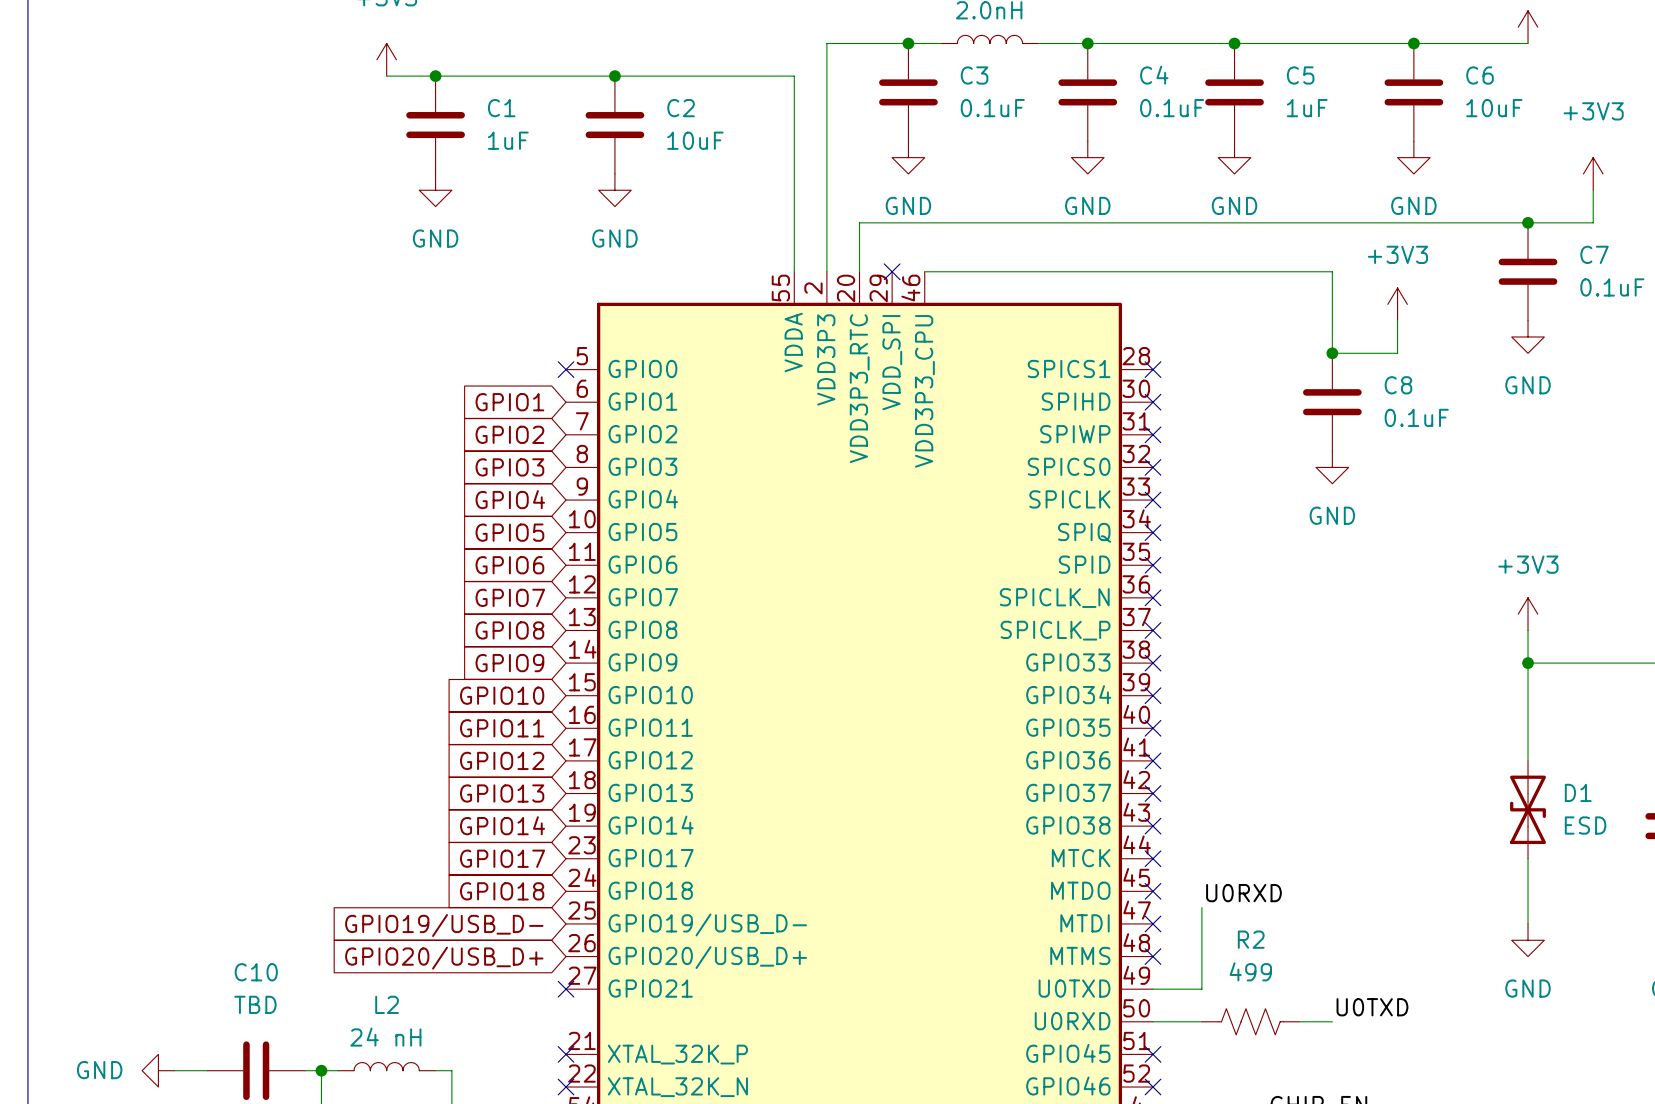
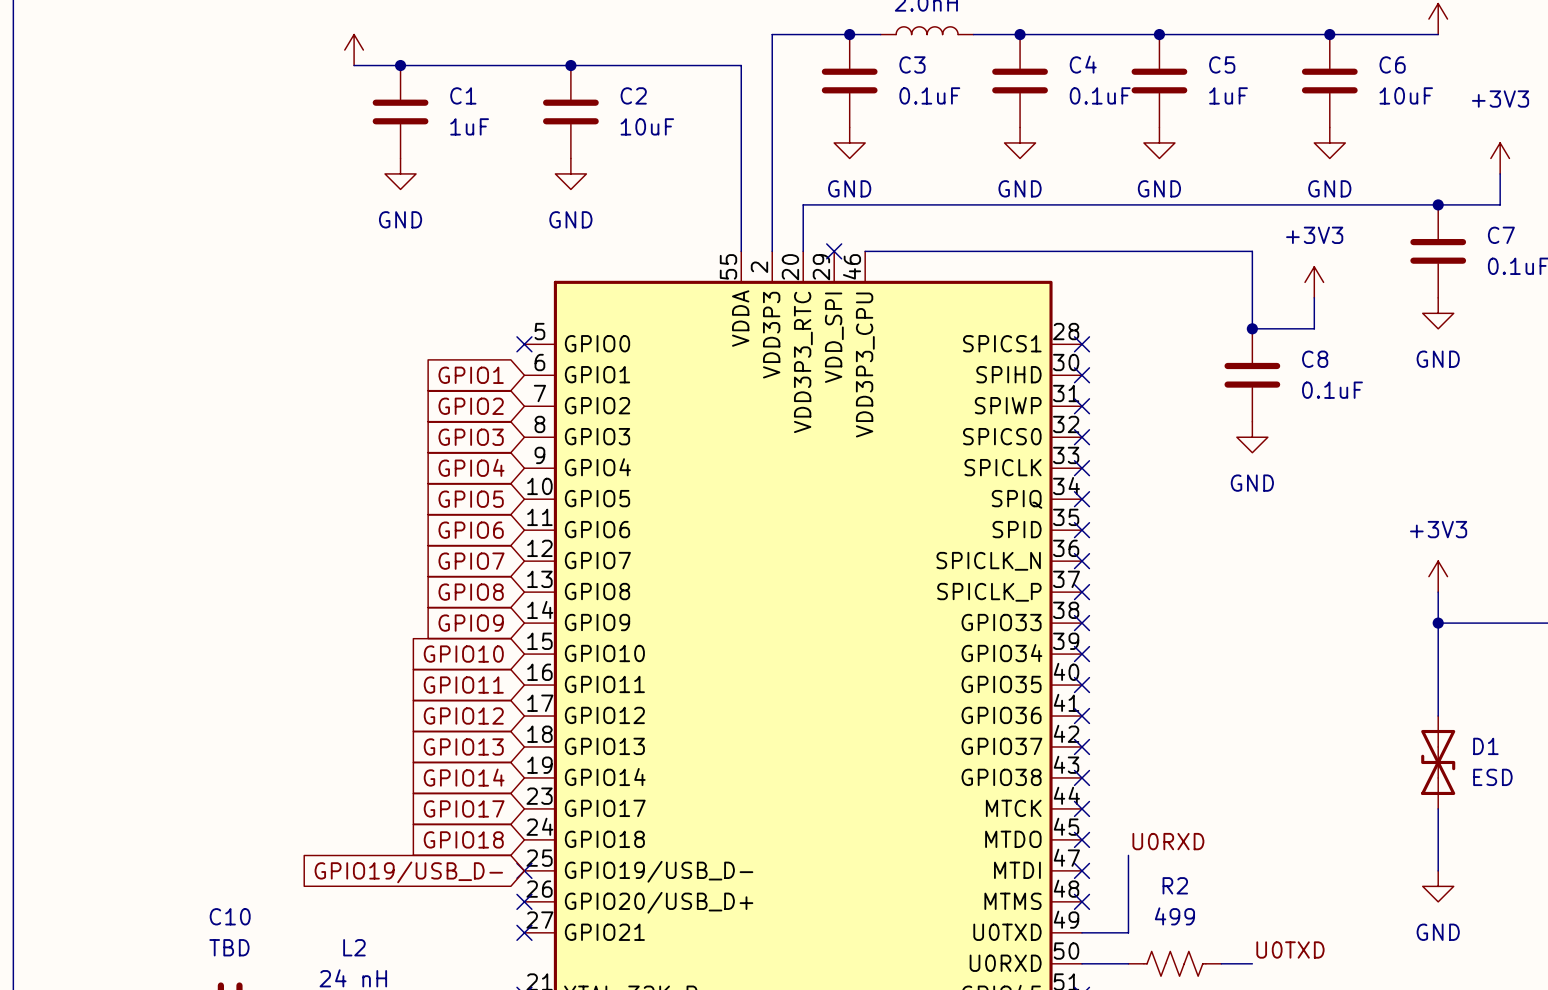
no-connect mark: none -> (524, 870)
no-connect mark: none -> (524, 901)
global label: GPIO20/USB_D+ (444, 958) -> none

